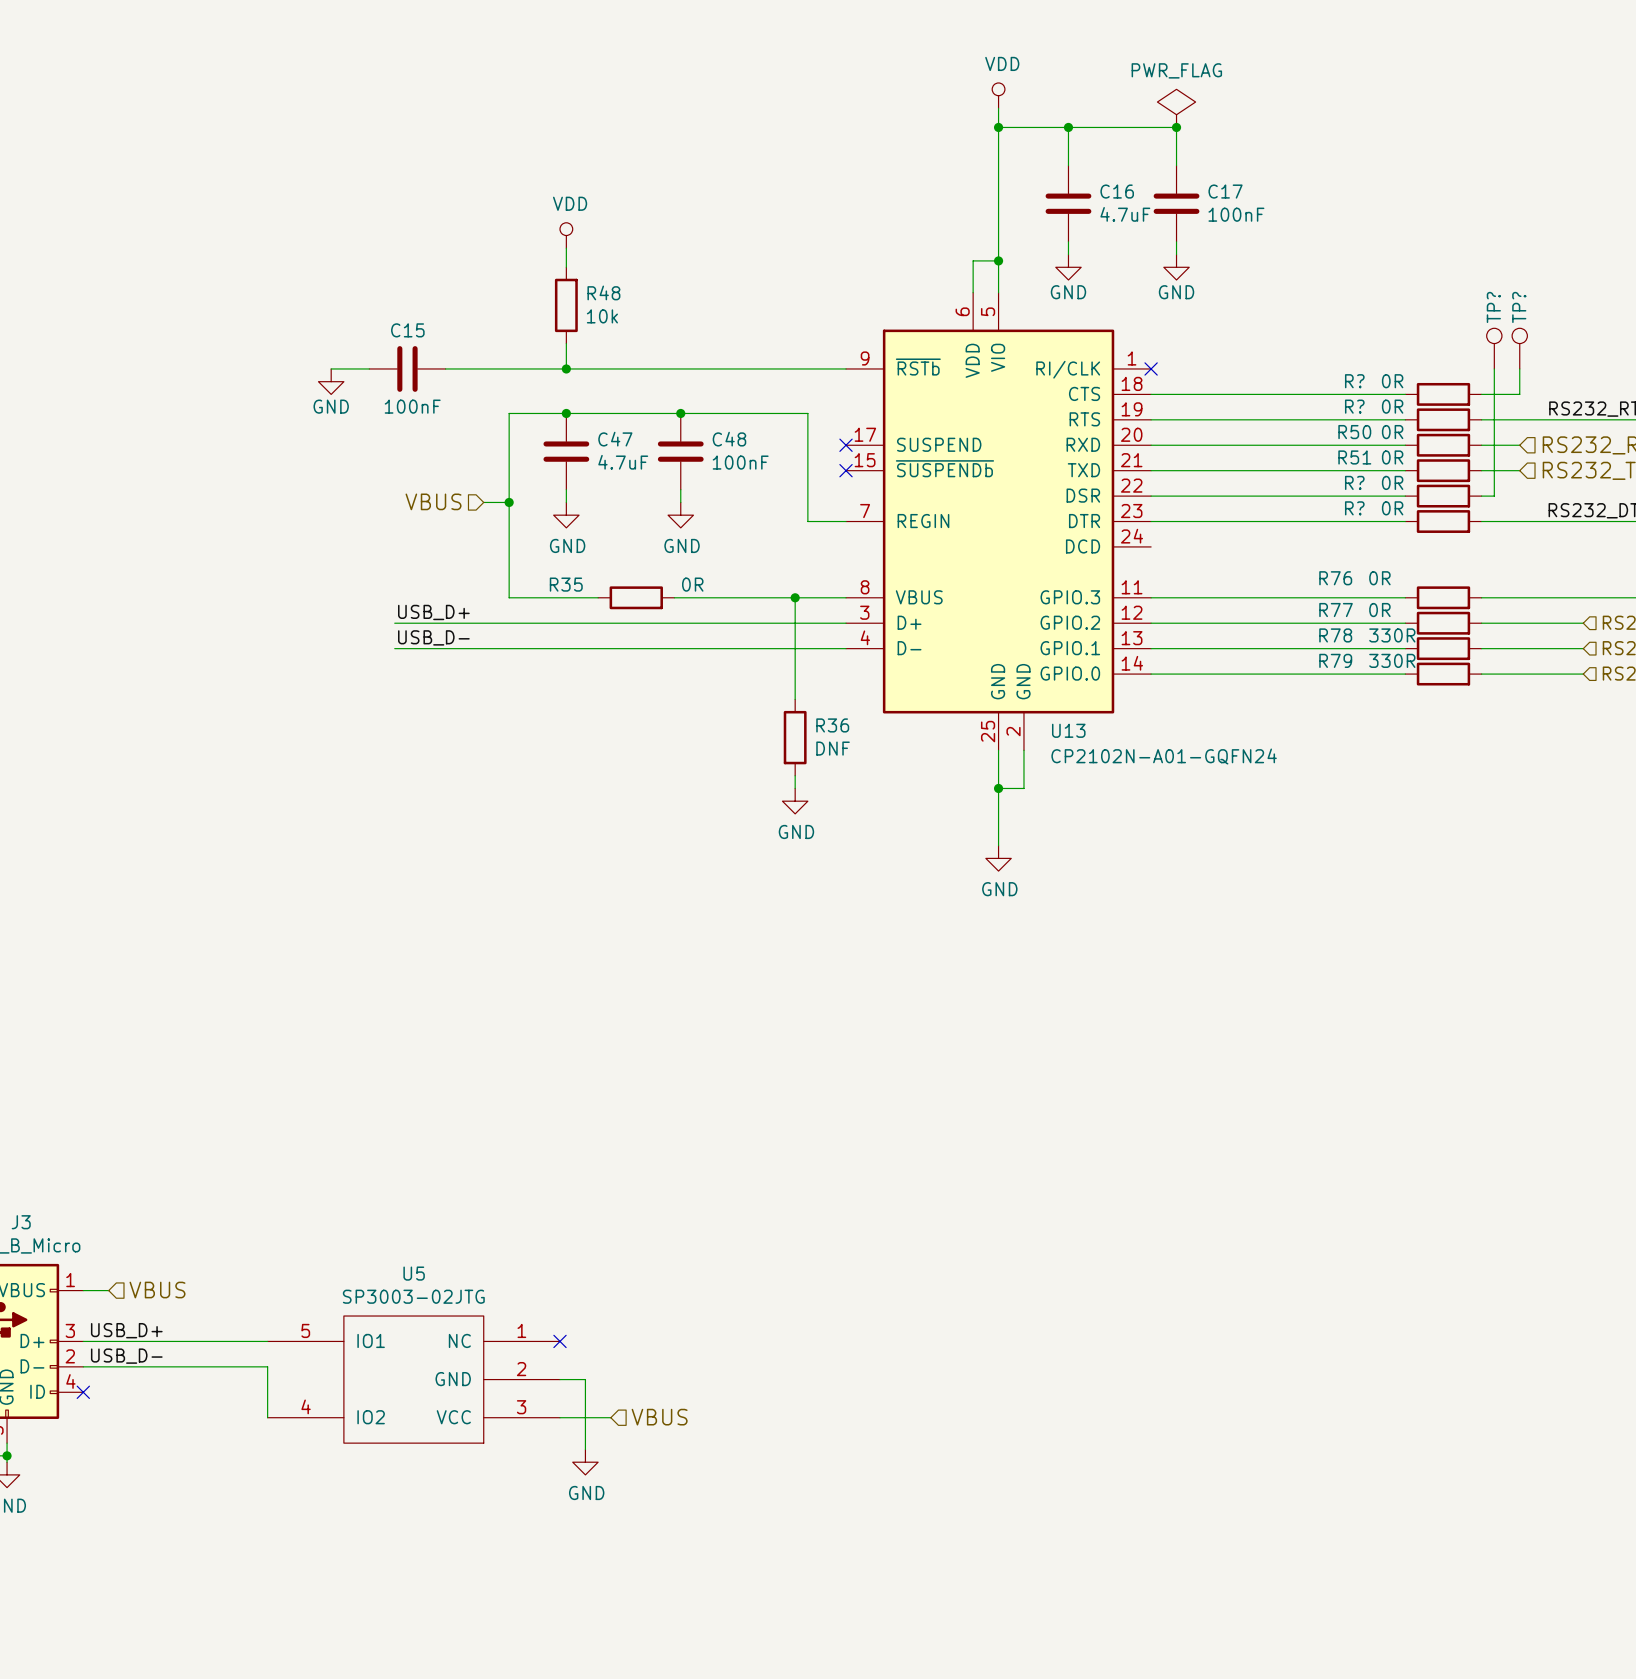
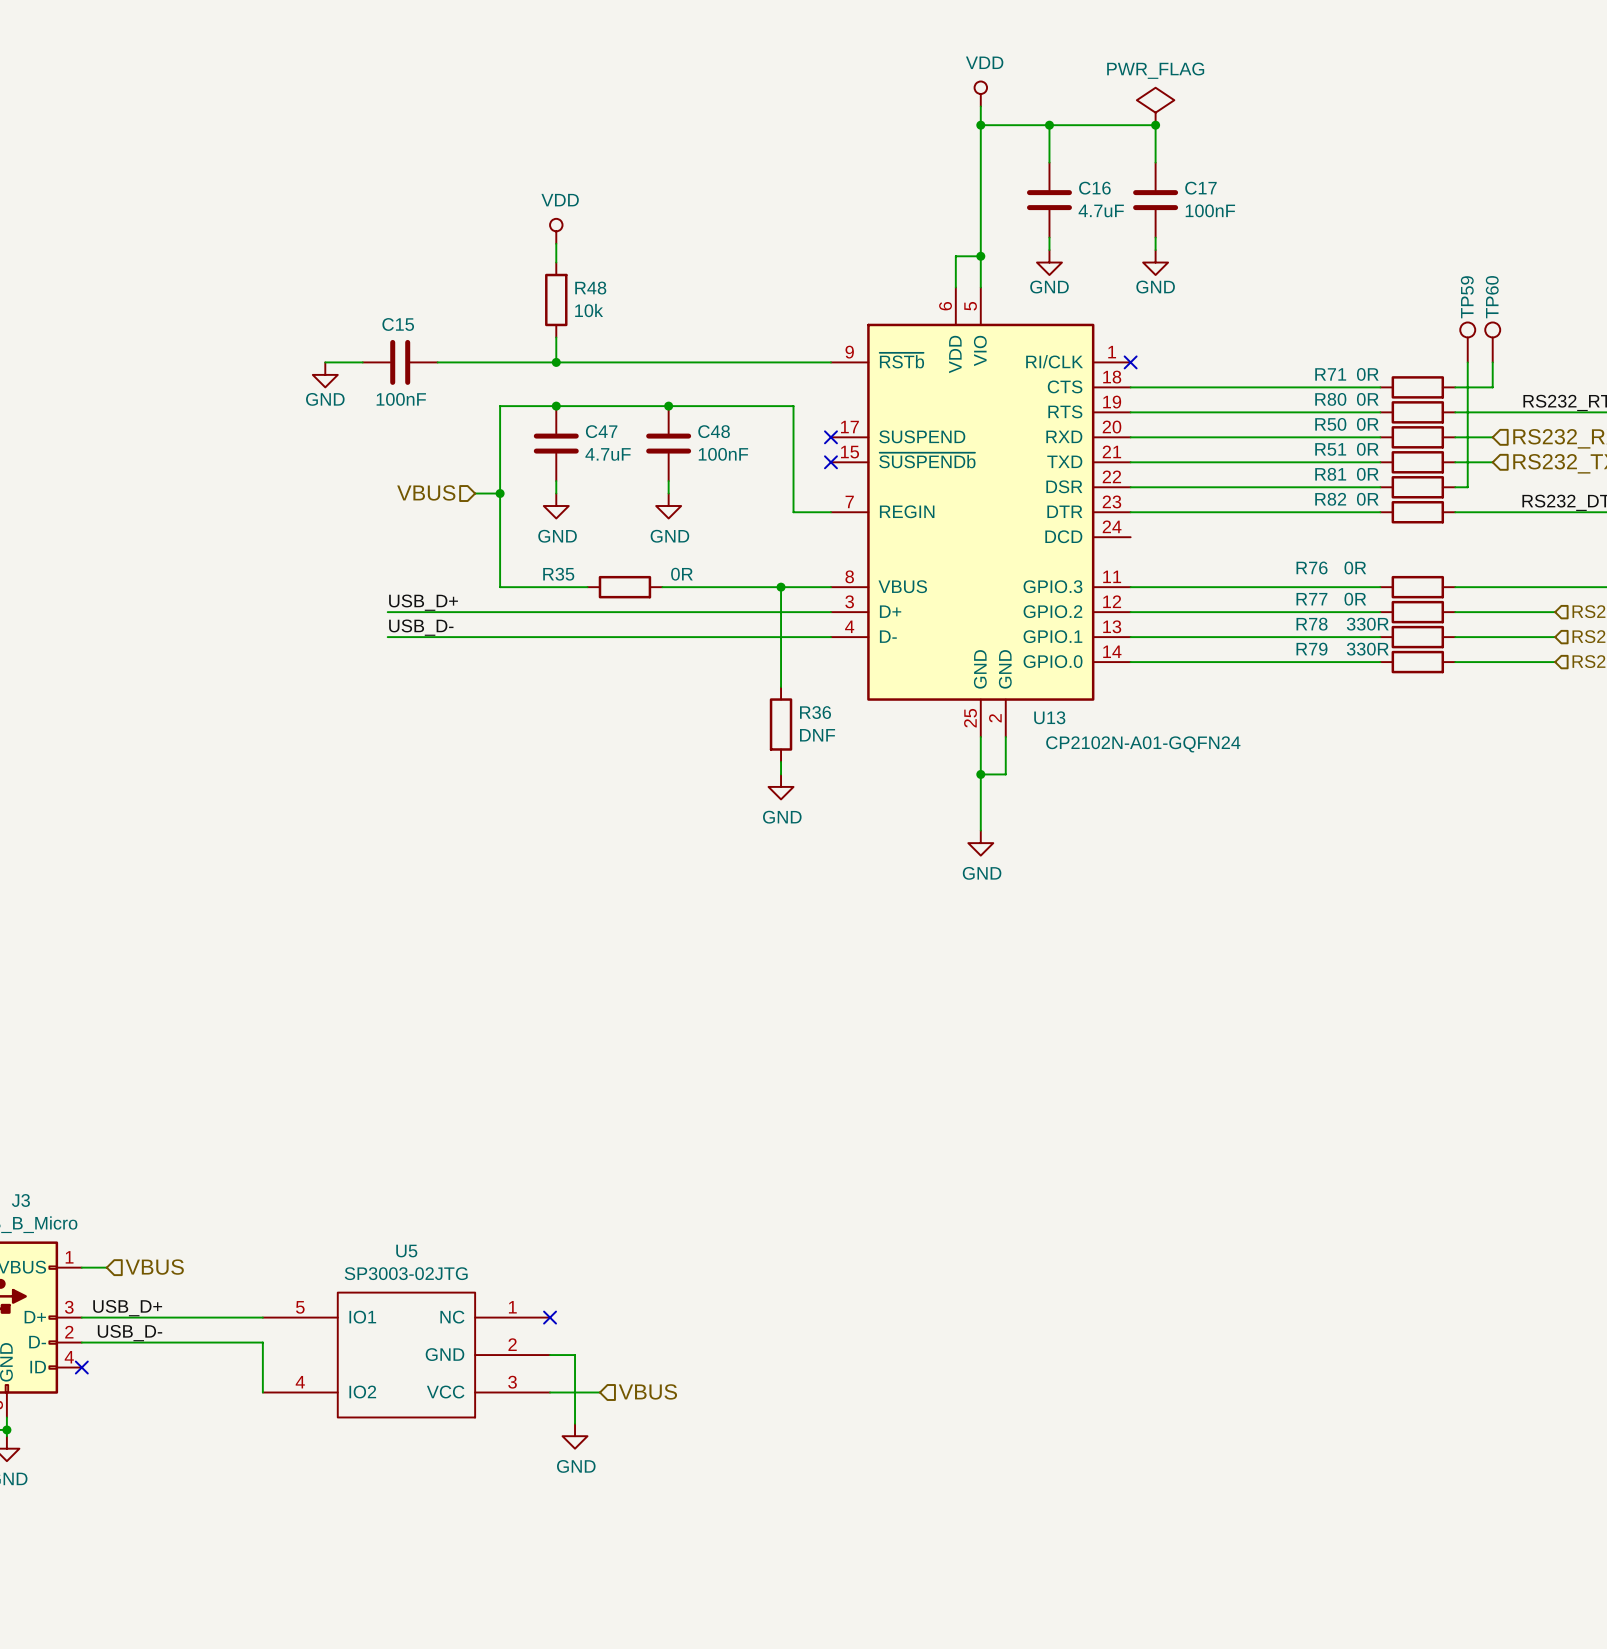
TP? name: TP? (1493, 307) -> TP59 (1467, 297)
TP? name: TP? (1519, 307) -> TP60 (1492, 297)
R? name: R? (1354, 381) -> R71 (1330, 374)
R? name: R? (1354, 406) -> R80 (1330, 399)
R? name: R? (1354, 482) -> R81 (1330, 474)
R? name: R? (1354, 508) -> R82 (1330, 499)

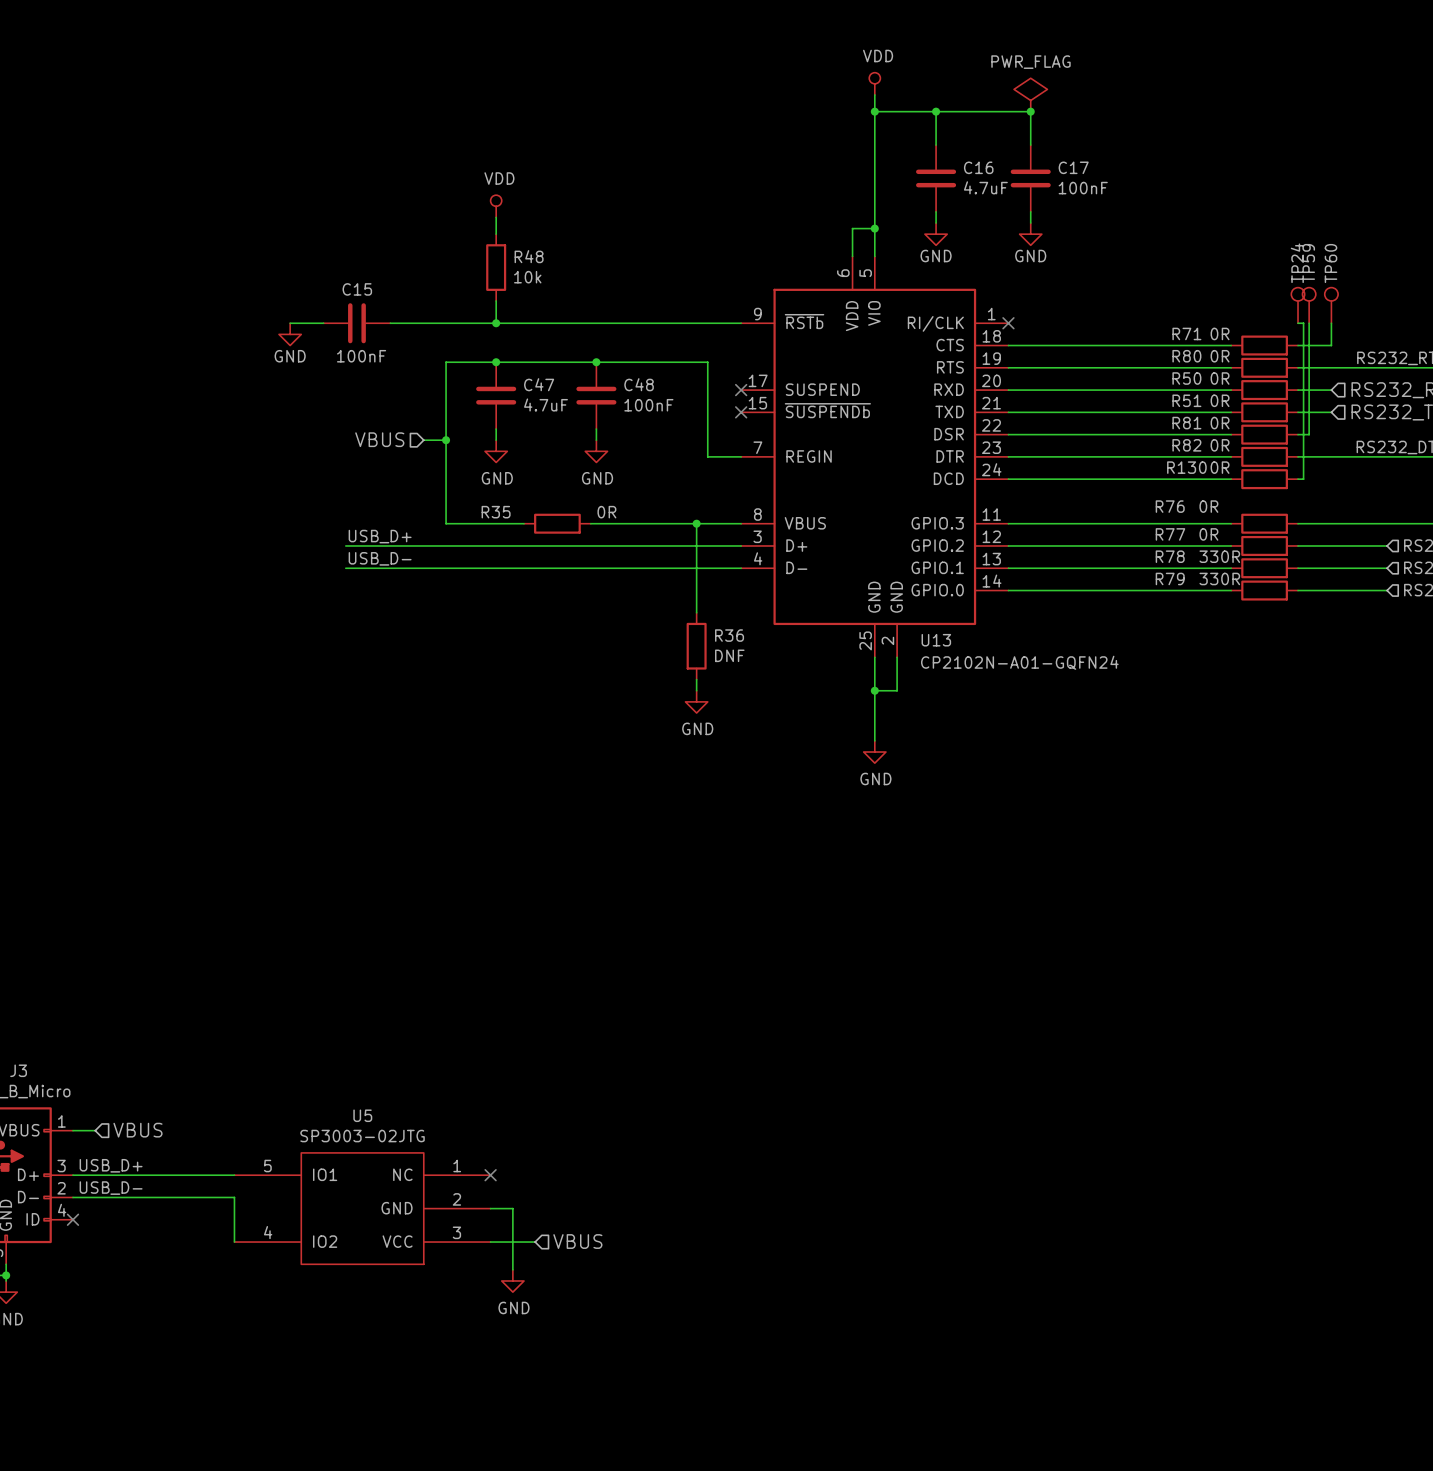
TP24: none -> (1298, 305)
wire: none -> (1298, 323) (1303, 323) (1303, 479) (1298, 479)
wire: none -> (1008, 479) (1231, 479)
R130: none -> 0R (1264, 479)

